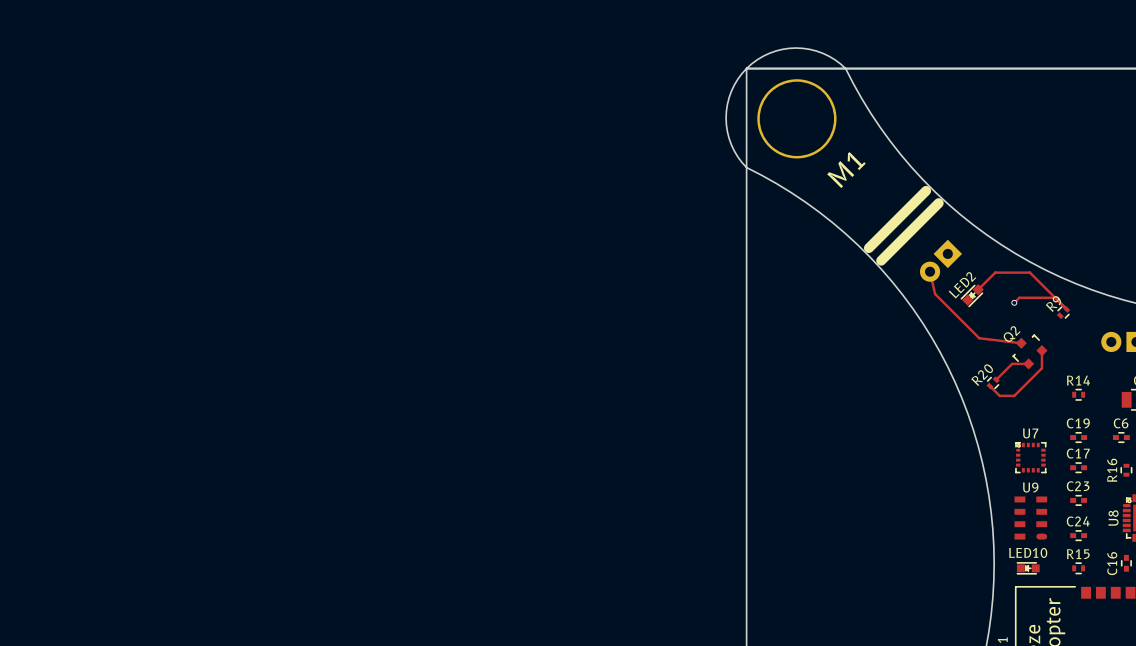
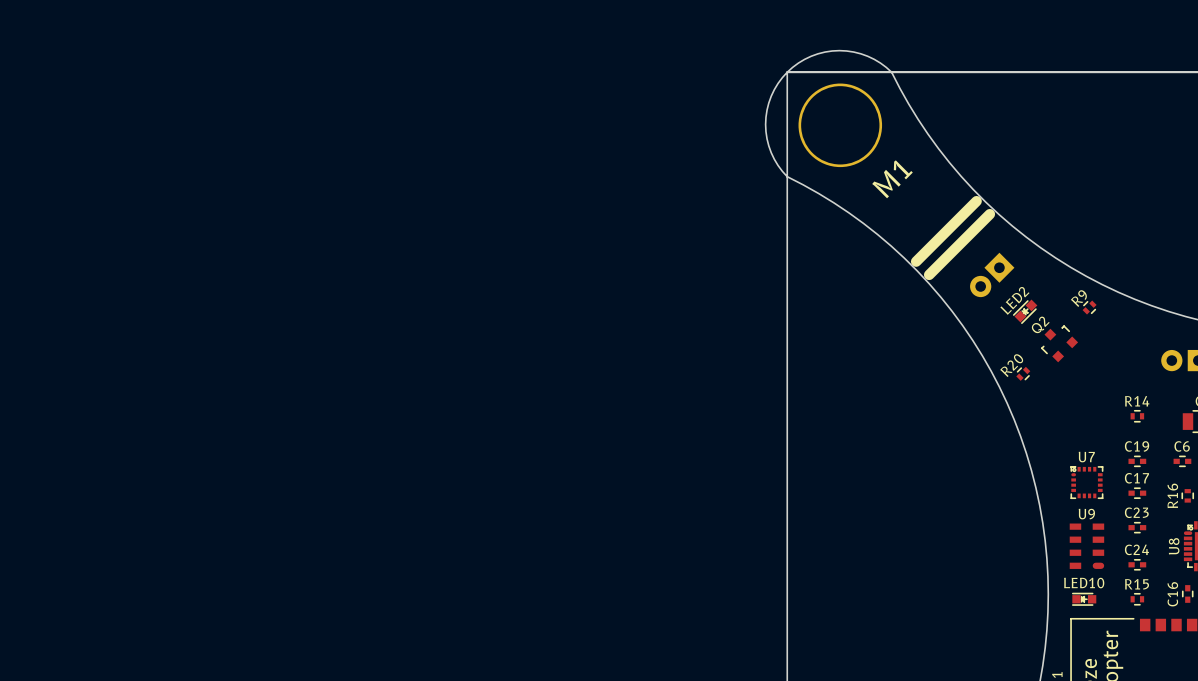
track: (930, 271) (935, 294) (979, 338) (1021, 343) -> none
track: (978, 289) (995, 272) (1029, 272) (1066, 309) -> none
track: (1055, 297) (1019, 297) (1014, 302) -> none
via: (1014, 302) -> none
R9 position: (1063, 312) -> (1089, 307)
track: (1041, 350) (1041, 368) (1014, 395) (999, 395) (989, 386) -> none
Q2 position: (1030, 351) -> (1059, 343)
track: (1028, 363) (1012, 363) (996, 379) -> none
R20 position: (993, 382) -> (1023, 373)

